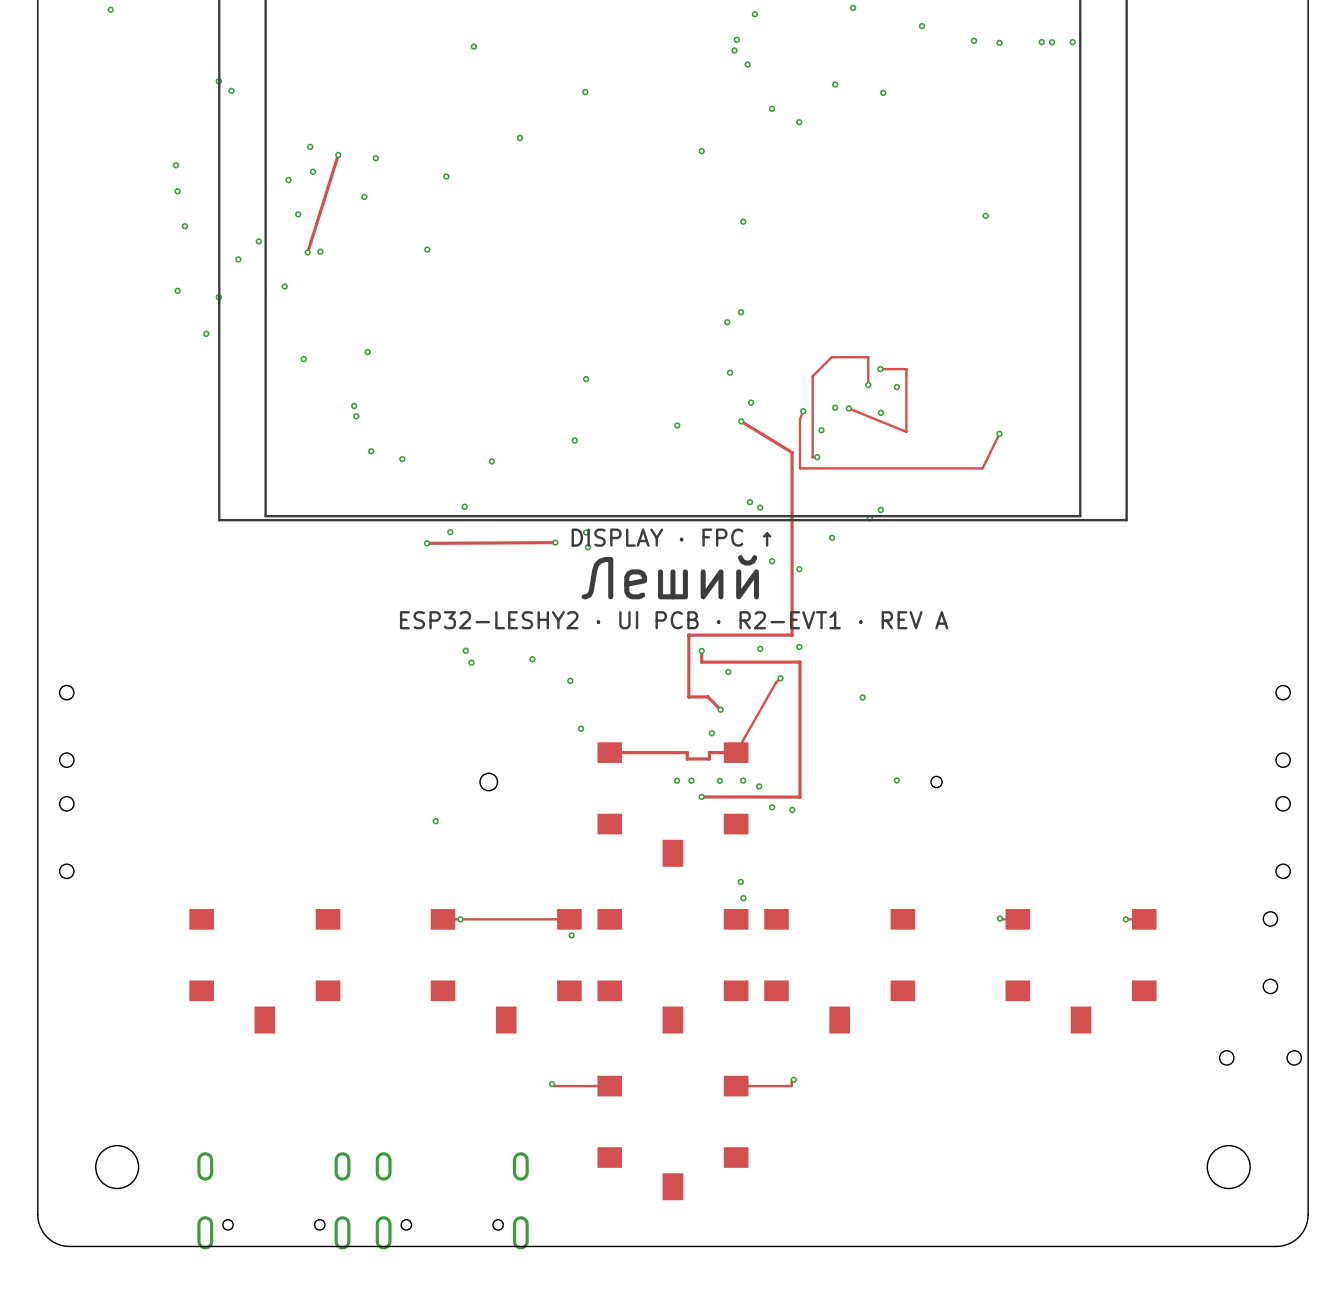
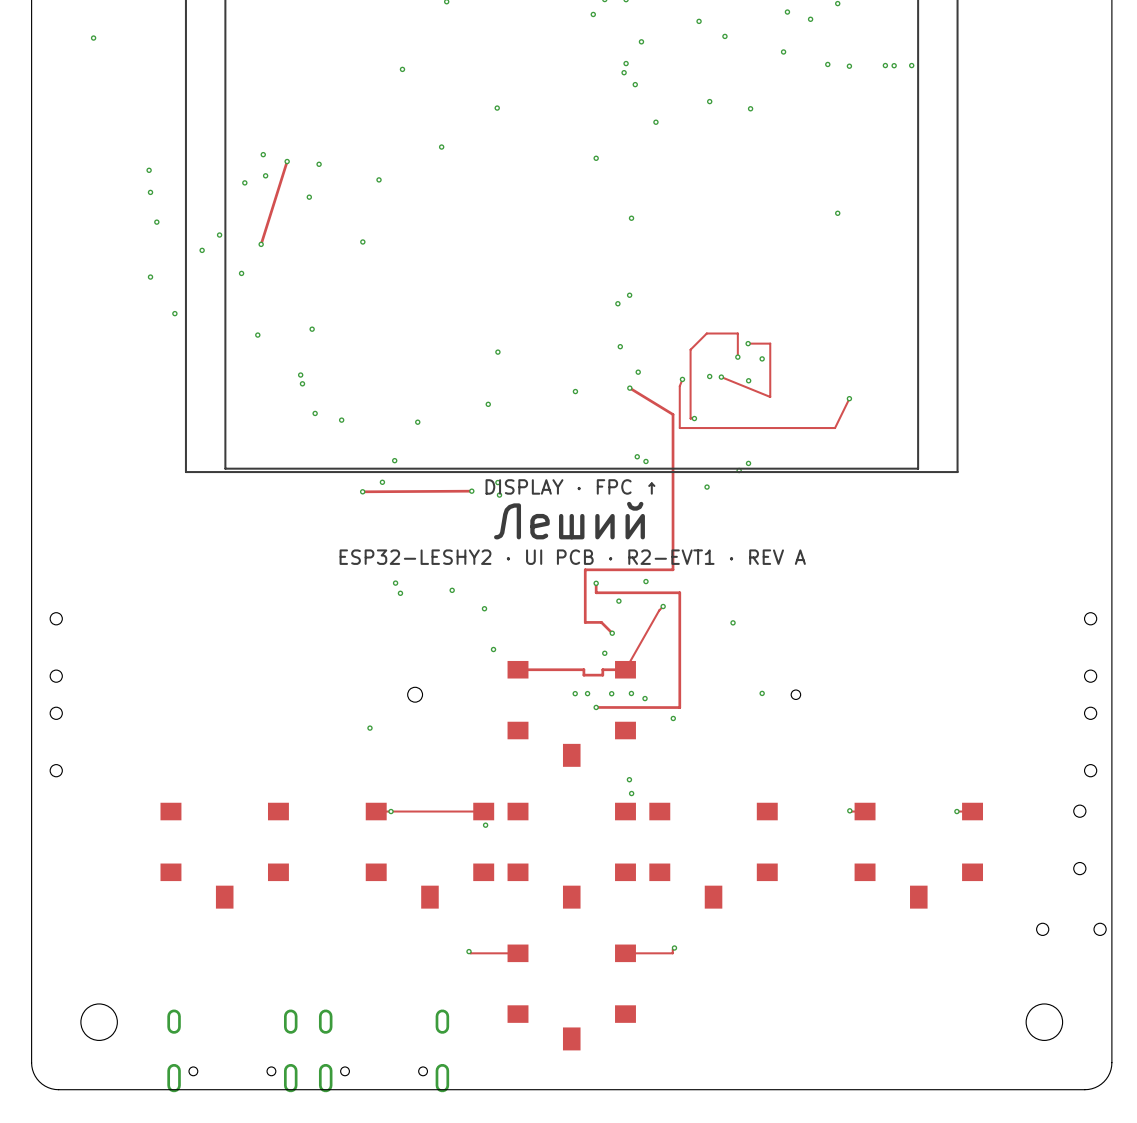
via: (218, 81) -> none
via: (231, 90) -> none
via: (799, 122) -> none
via: (298, 214) -> none
via: (320, 251) -> none
via: (218, 297) -> none
via: (821, 430) -> none
via: (772, 561) -> none
via: (799, 569) -> none
via: (799, 646) -> none
via: (772, 807) -> none

